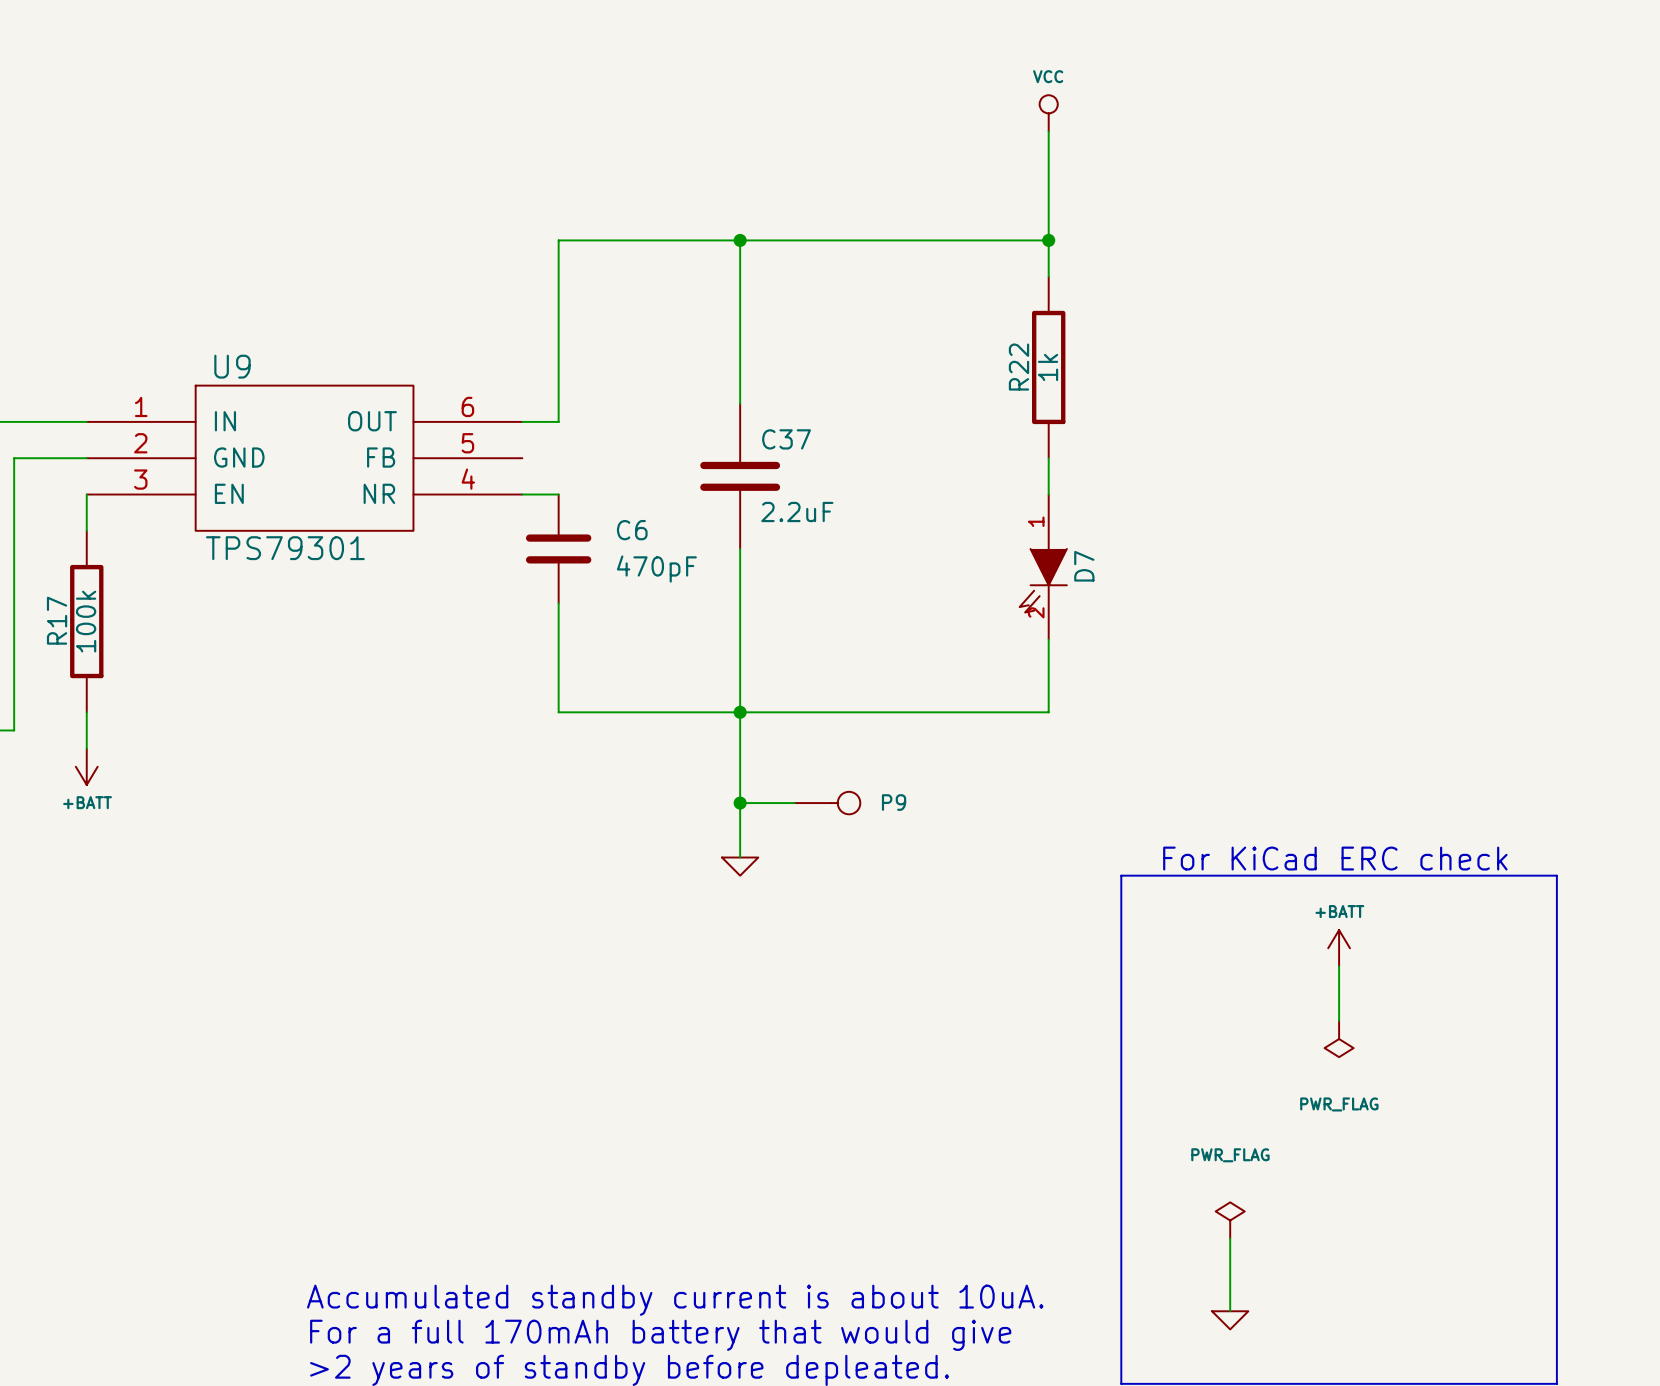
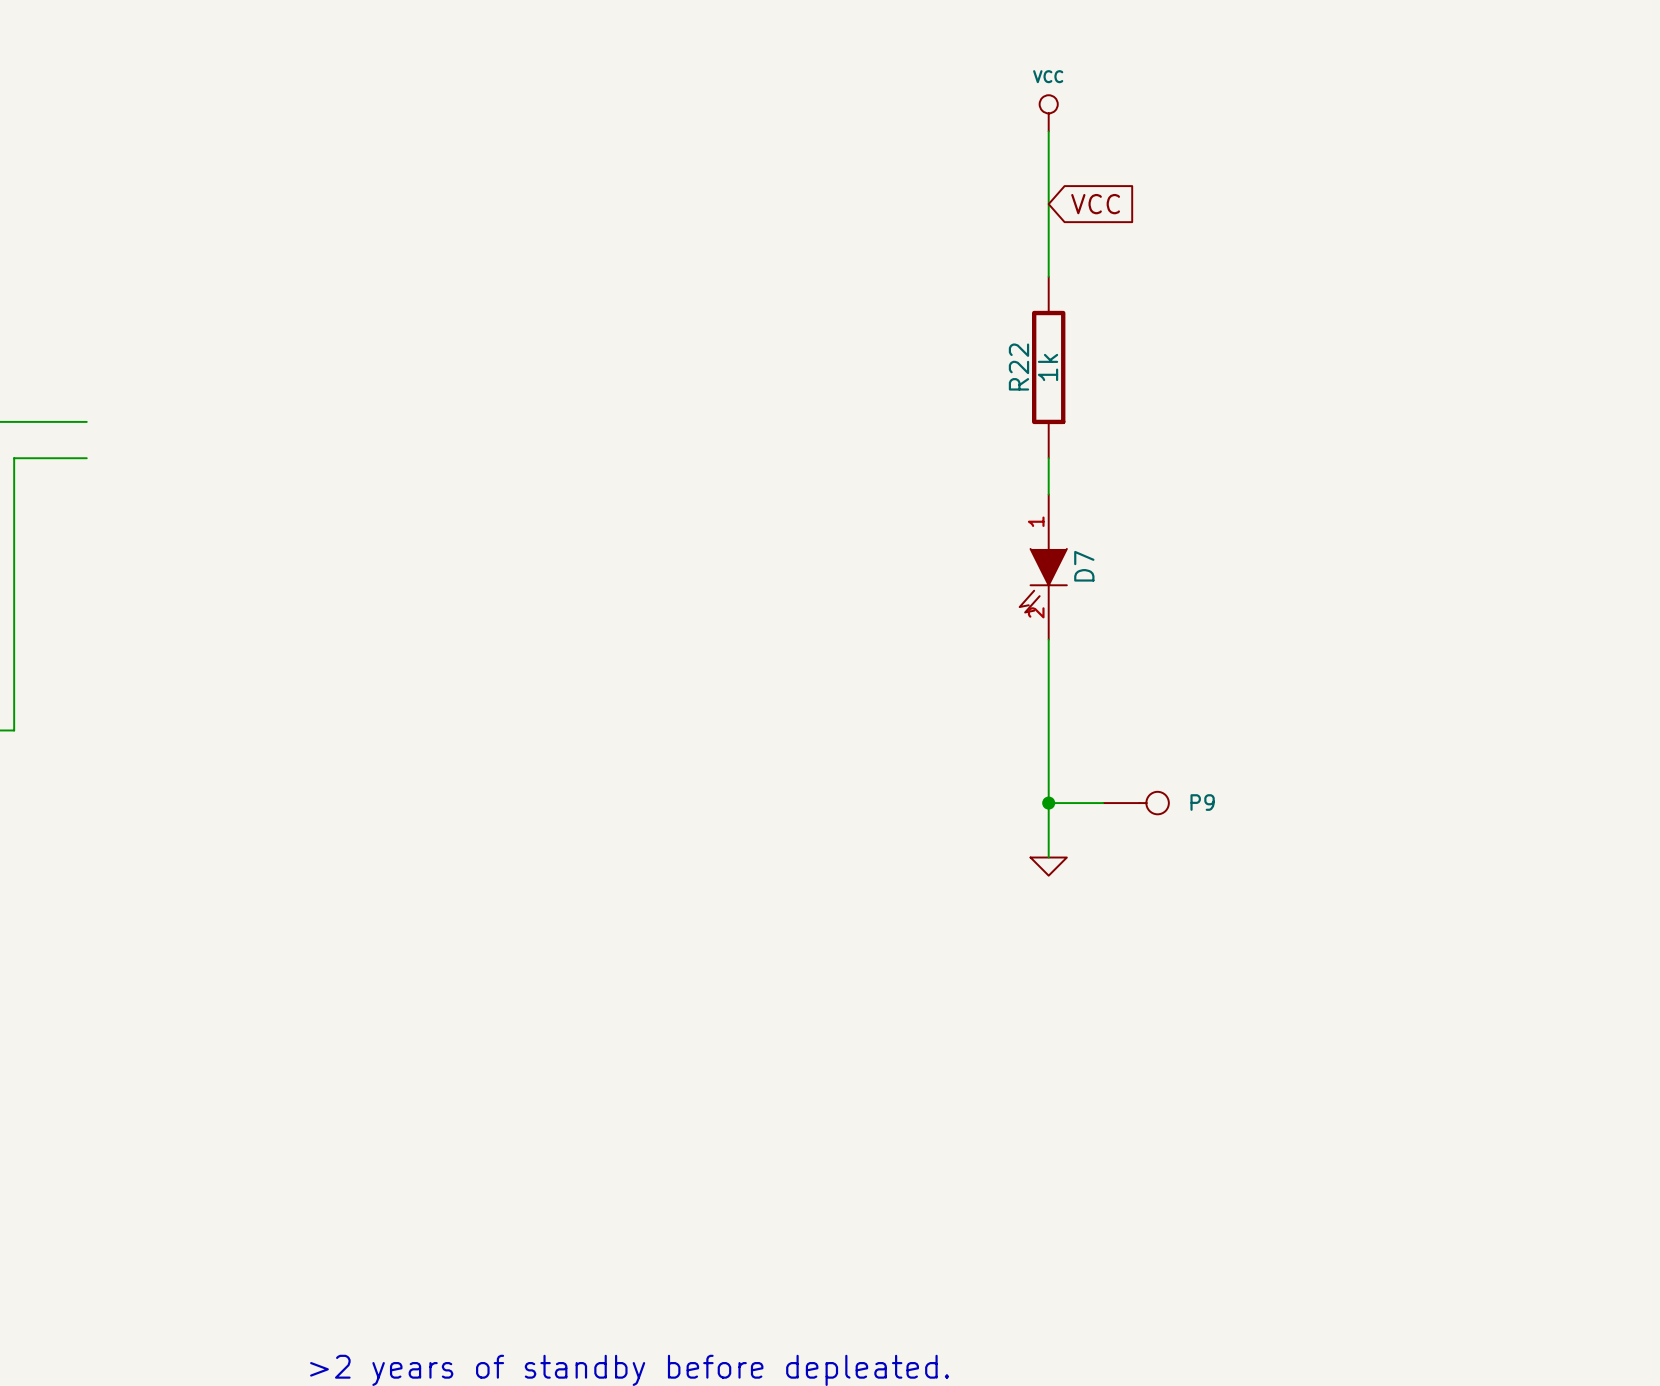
global label: none -> VCC (1095, 204)
wire: (740, 240) (740, 403) -> none
junction: (740, 240) -> none
wire: (1048, 240) (558, 240) (558, 421) (522, 421) -> none
junction: (1048, 240) -> none
U9: TPS79301 (304, 458) -> none
C37: 2.2uF (740, 476) -> none
wire: (86, 494) (86, 530) -> none
wire: (522, 494) (558, 494) -> none
C6: 470pF (558, 548) -> none
wire: (740, 548) (740, 857) -> none
wire: (558, 603) (558, 712) (1048, 712) -> (1048, 857) (1048, 712)
R17: 100k (86, 621) -> none
wire: (86, 712) (86, 748) -> none
junction: (740, 712) -> none
power symbol: +BATT (86, 766) -> none
wire: (740, 803) (794, 803) -> (1048, 803) (1103, 803)
junction: (740, 803) -> none
P9 position: (827, 803) -> (1136, 803)
junction: none -> (1048, 803)
text: For KiCad ERC check (1335, 858) -> none
power symbol: (740, 866) -> none
power symbol: none -> (1048, 866)
line: (1121, 875) (1556, 875) (1556, 1383) (1121, 1383) (1121, 875) -> none
power symbol: +BATT (1339, 948) -> none
wire: (1339, 966) (1339, 1020) -> none
power symbol: PWR_FLAG (1339, 1039) -> none
power symbol: PWR_FLAG (1230, 1220) -> none
wire: (1230, 1238) (1230, 1311) -> none
text: Accumulated standby current is about 10uA. (675, 1300) -> none
power symbol: (1230, 1320) -> none
text: For a full 170mAh battery that would give (660, 1335) -> none

